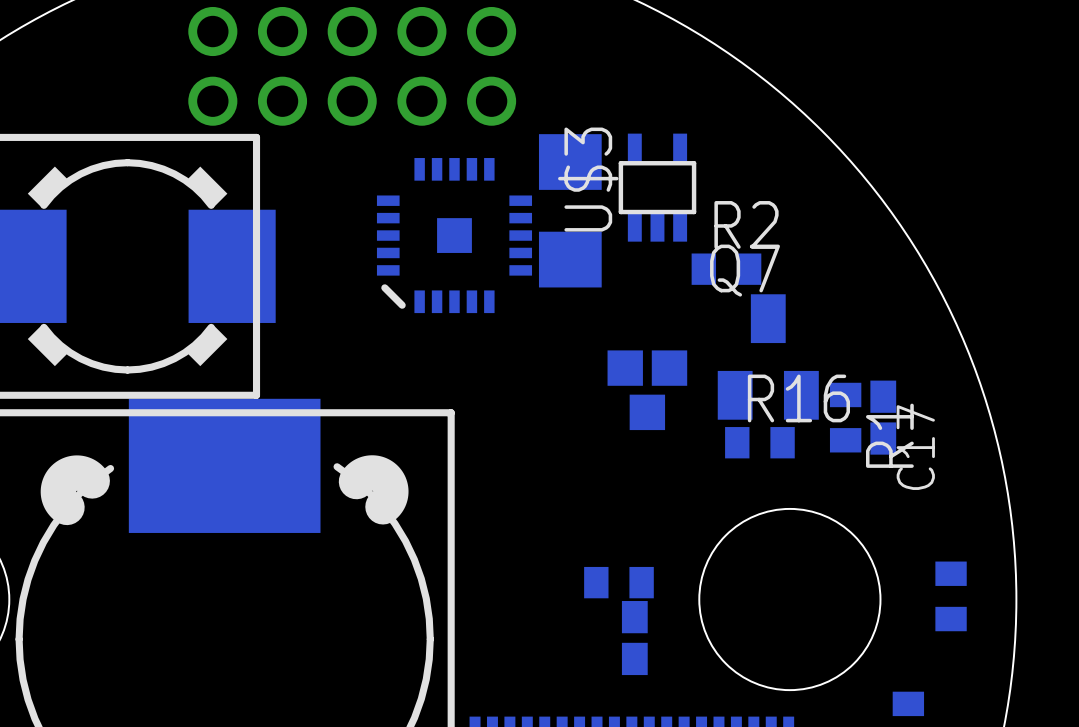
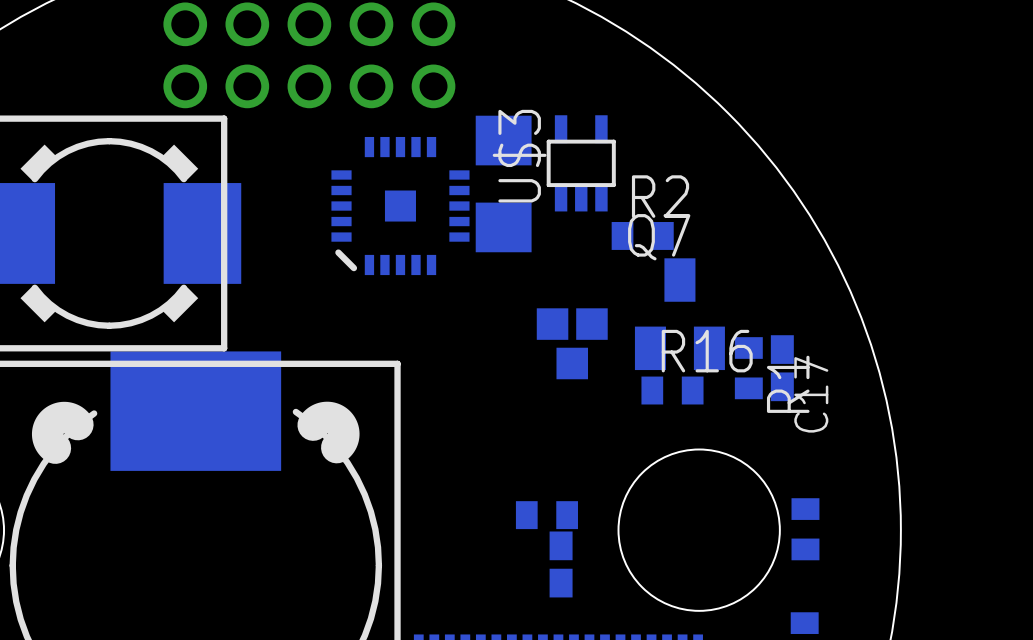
part position: (951, 596) -> (805, 529)

